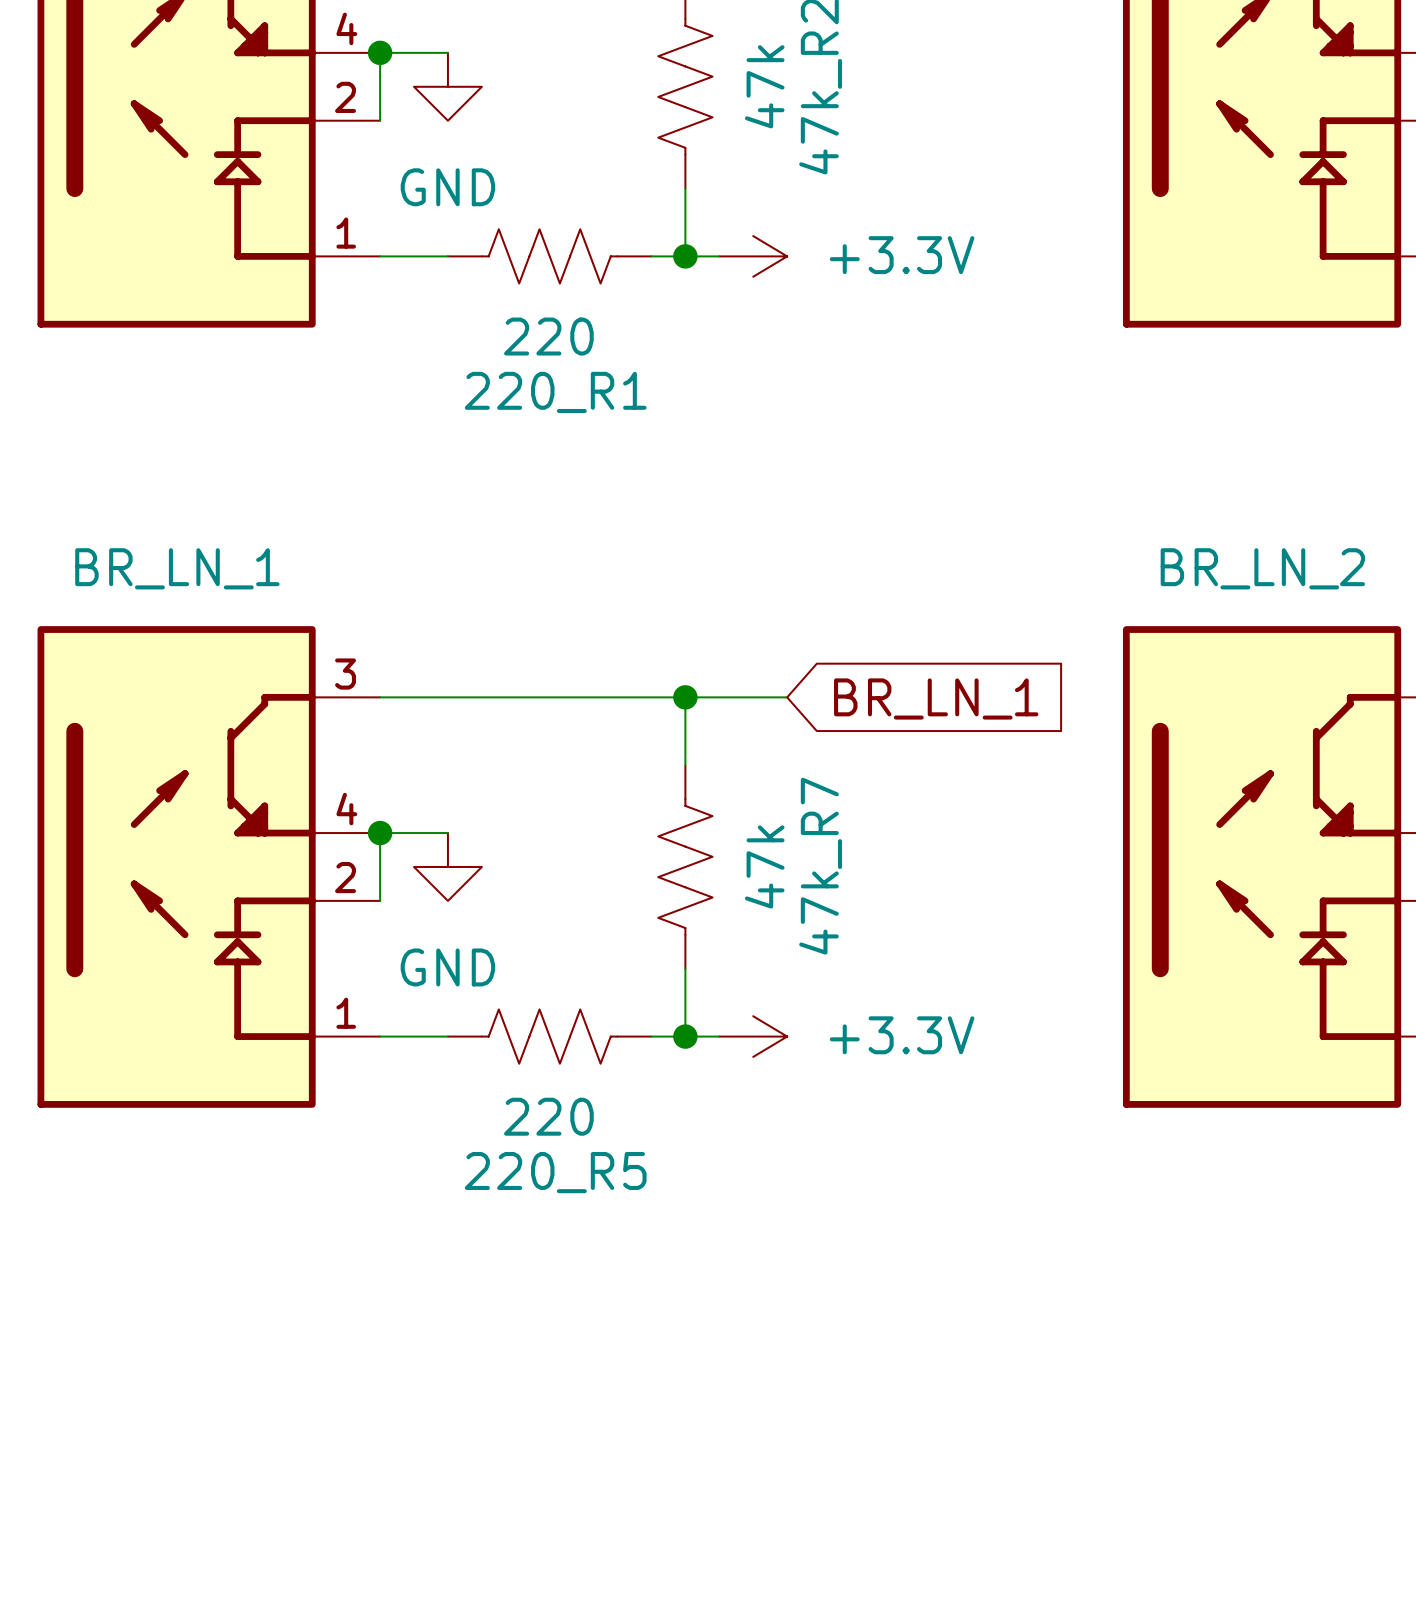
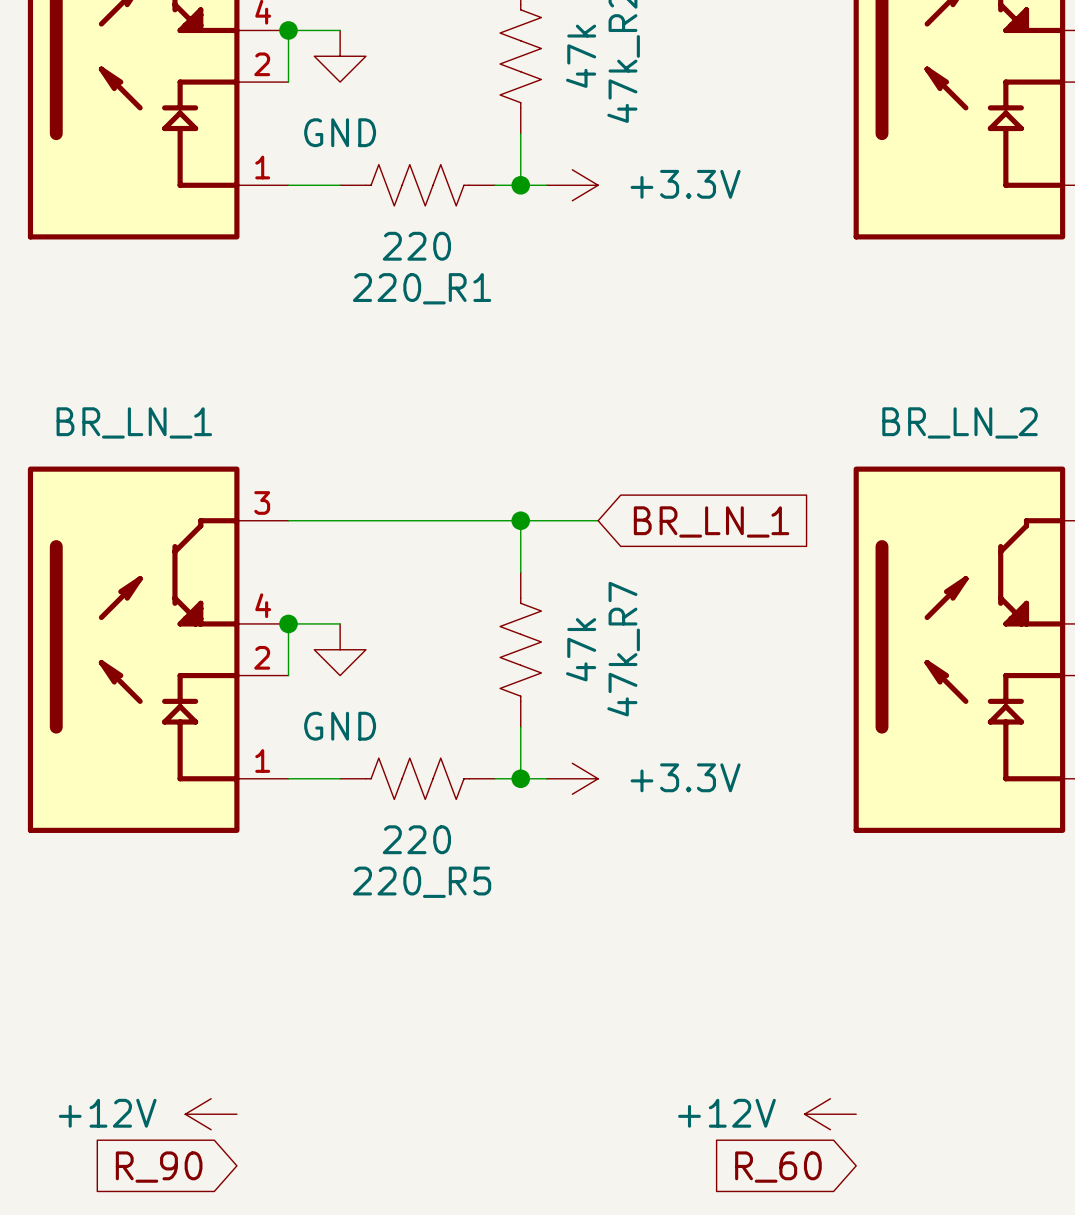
power symbol: none -> +12V (211, 1114)
power symbol: none -> +12V (830, 1114)
global label: none -> R_90 (159, 1167)
global label: none -> R_60 (778, 1167)

